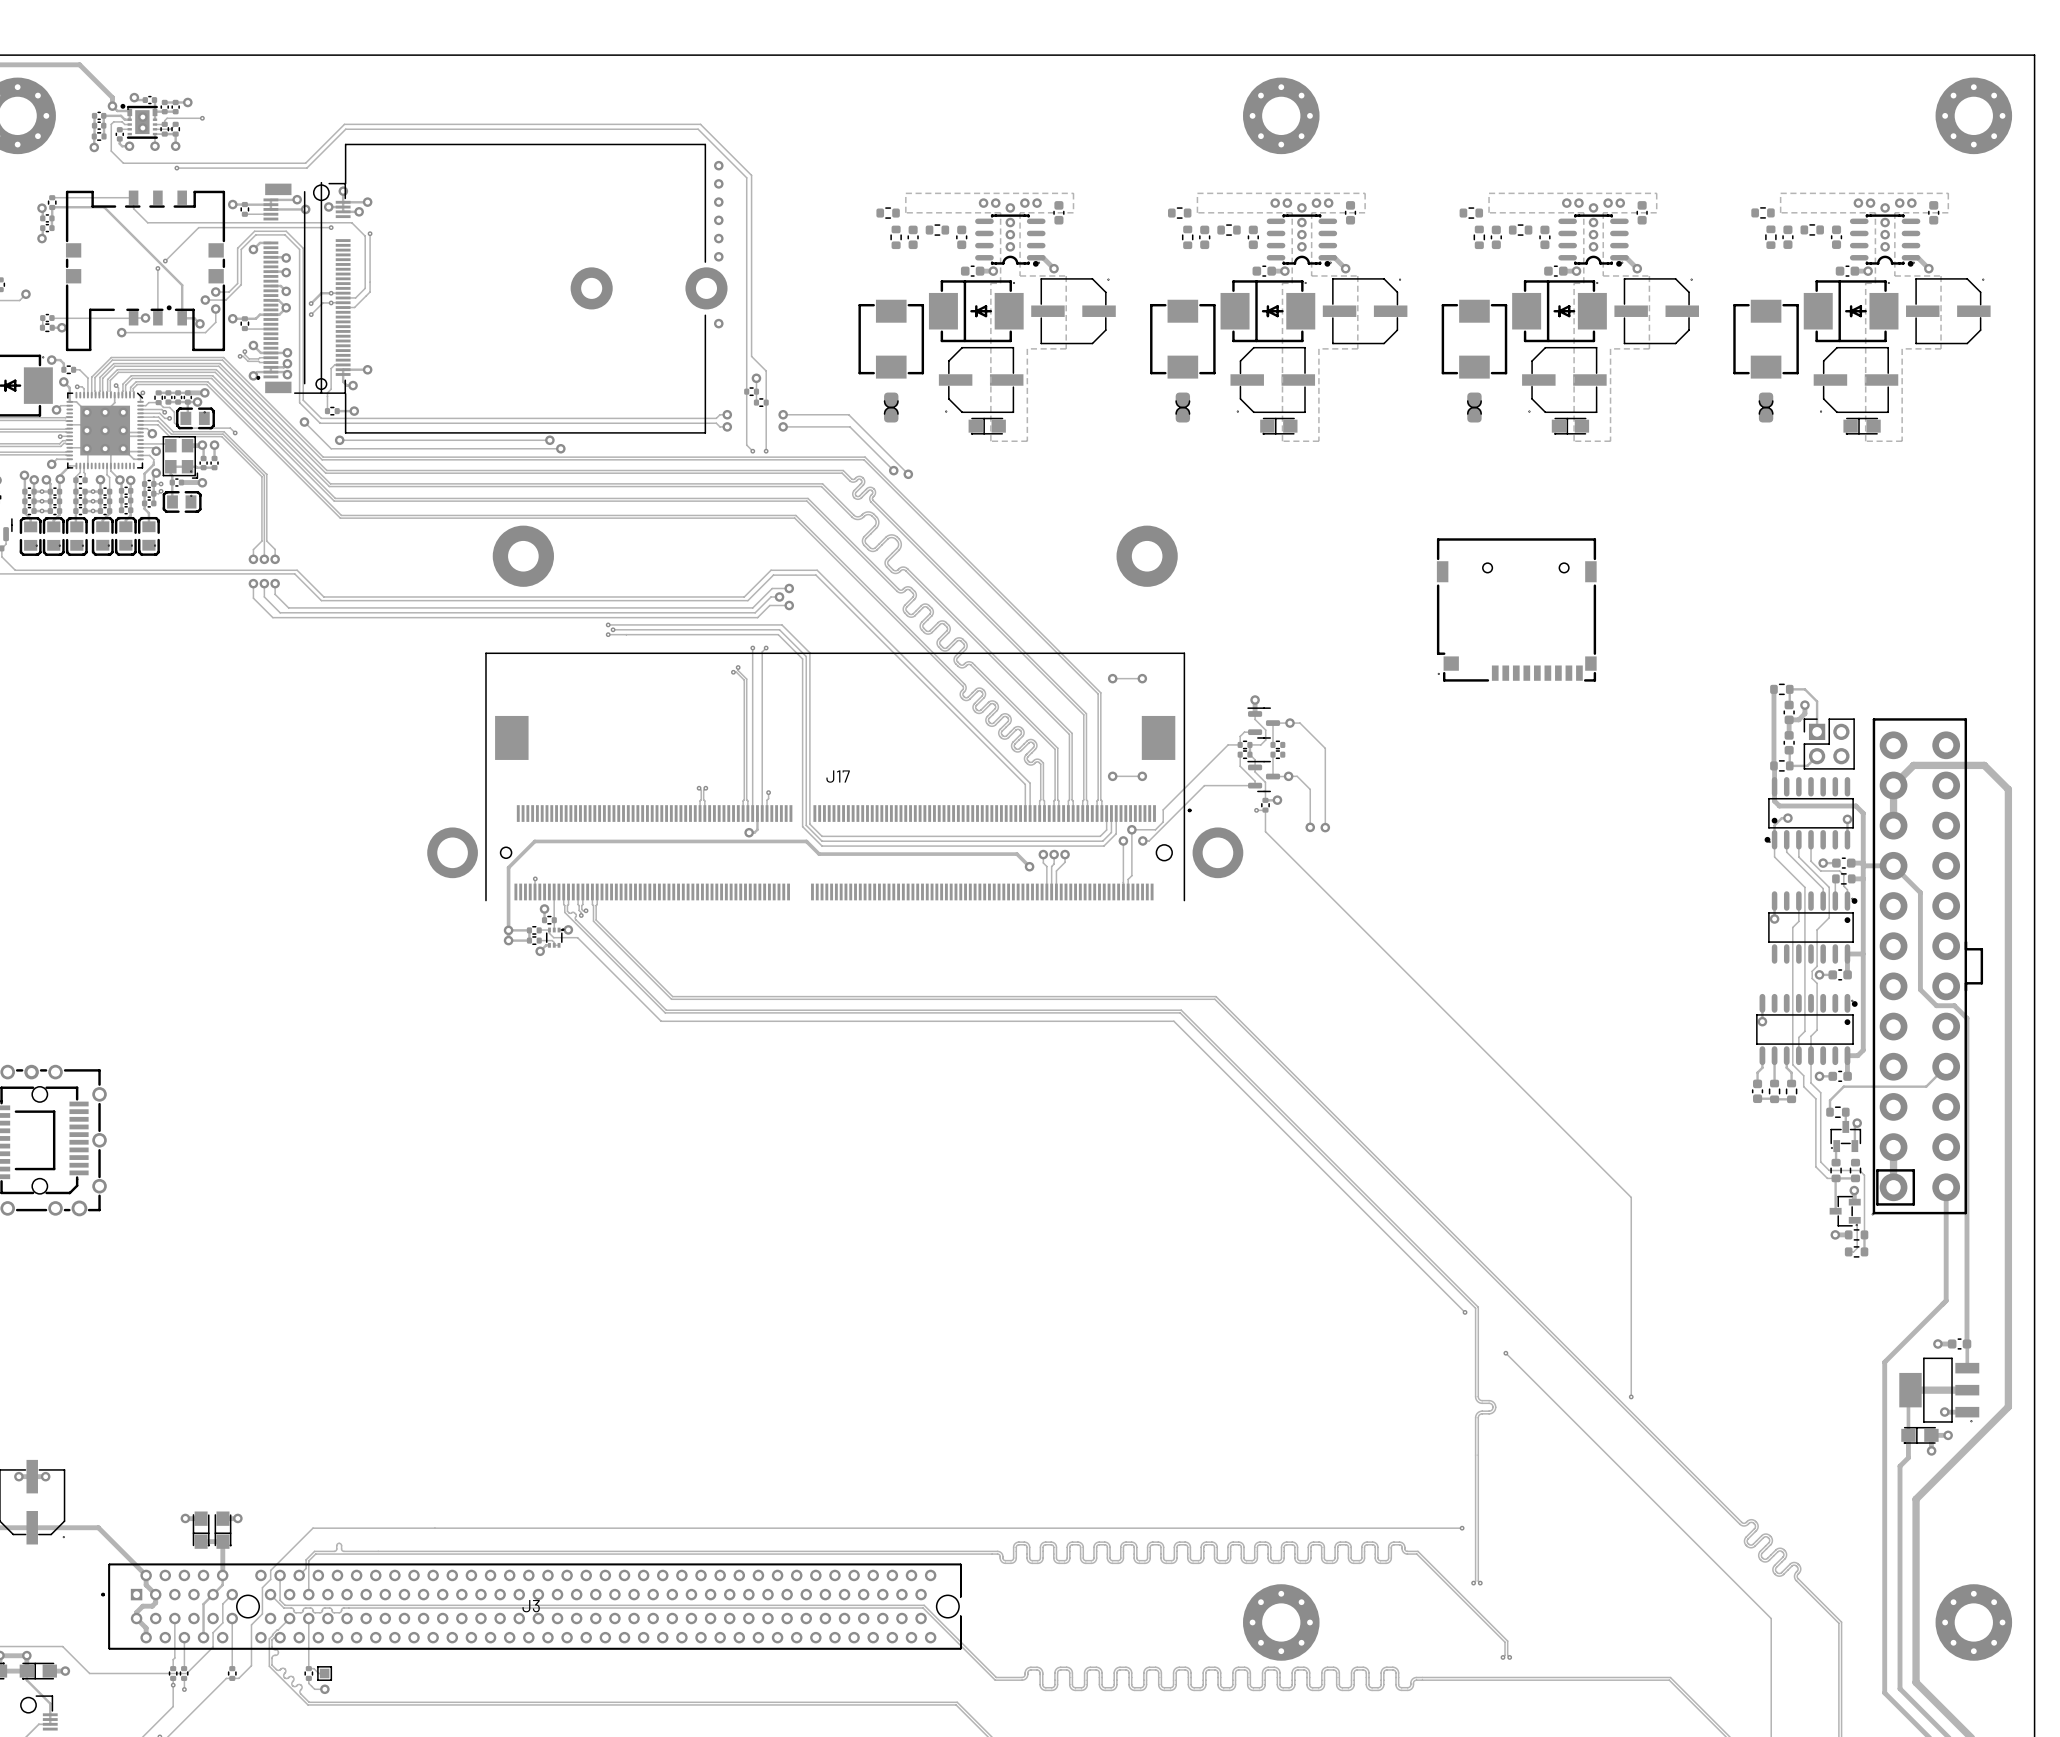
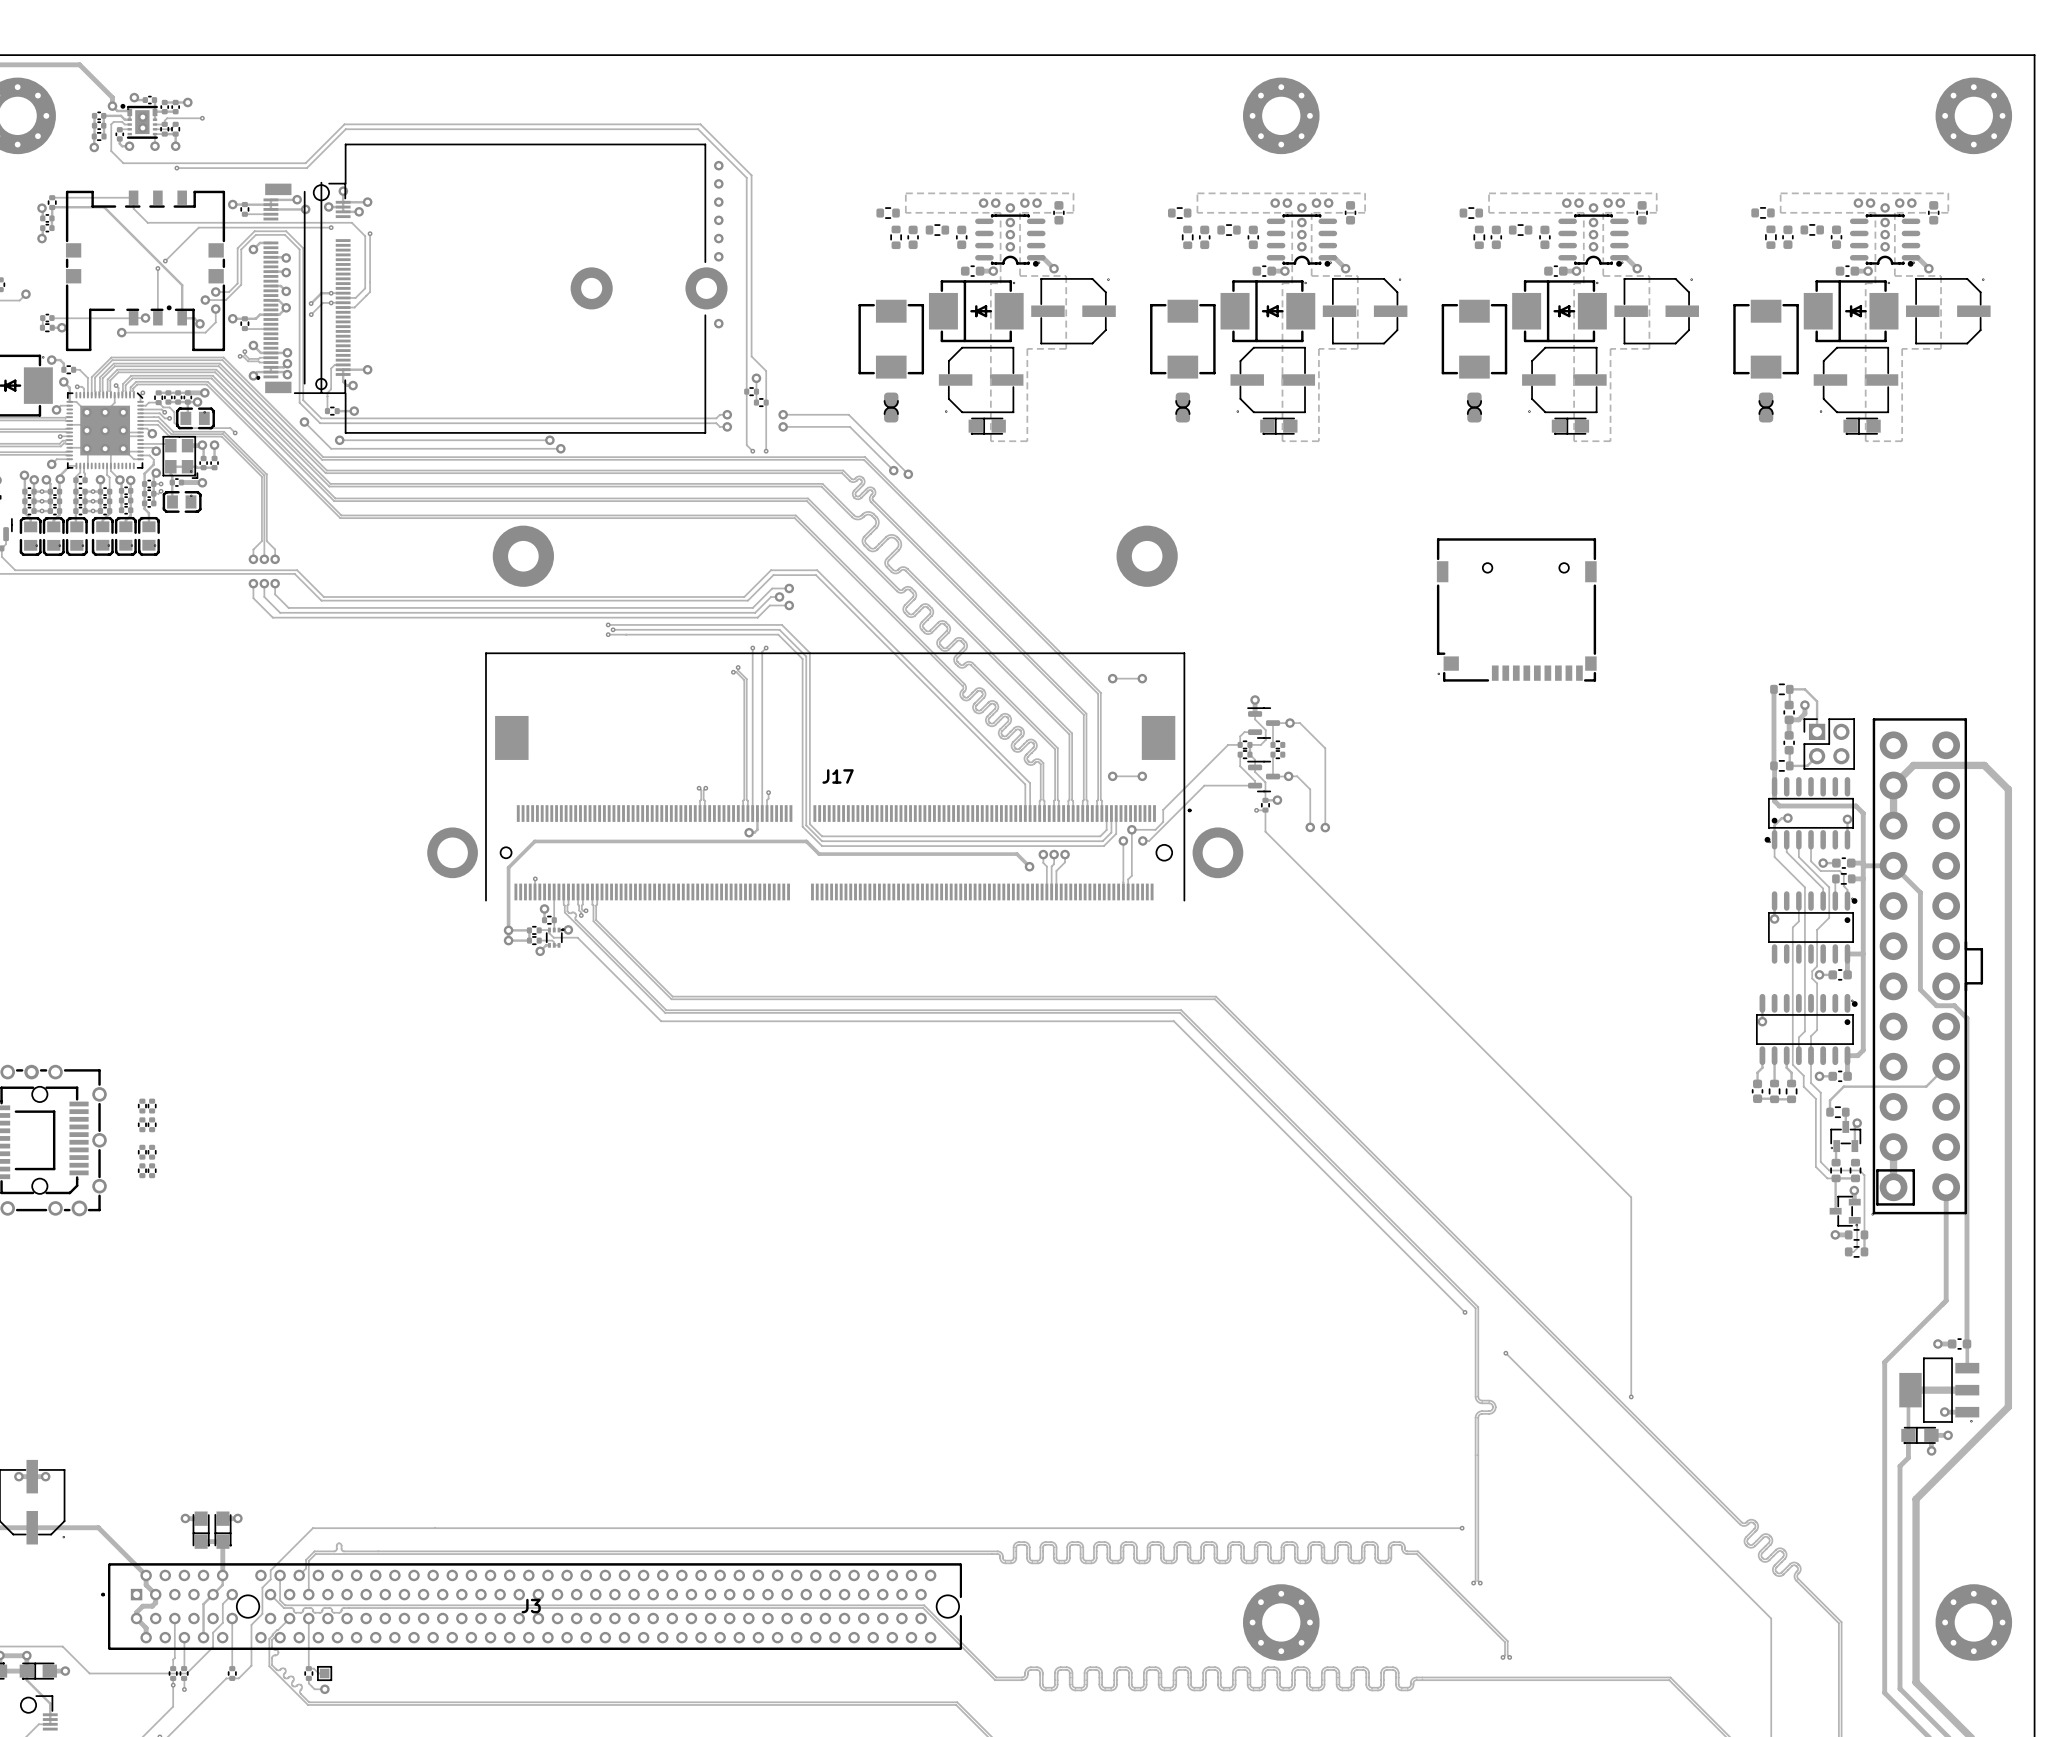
part: none -> (142, 1106)
part: none -> (152, 1106)
part: none -> (142, 1124)
part: none -> (152, 1124)
part: none -> (142, 1152)
part: none -> (152, 1152)
part: none -> (142, 1170)
part: none -> (152, 1170)

